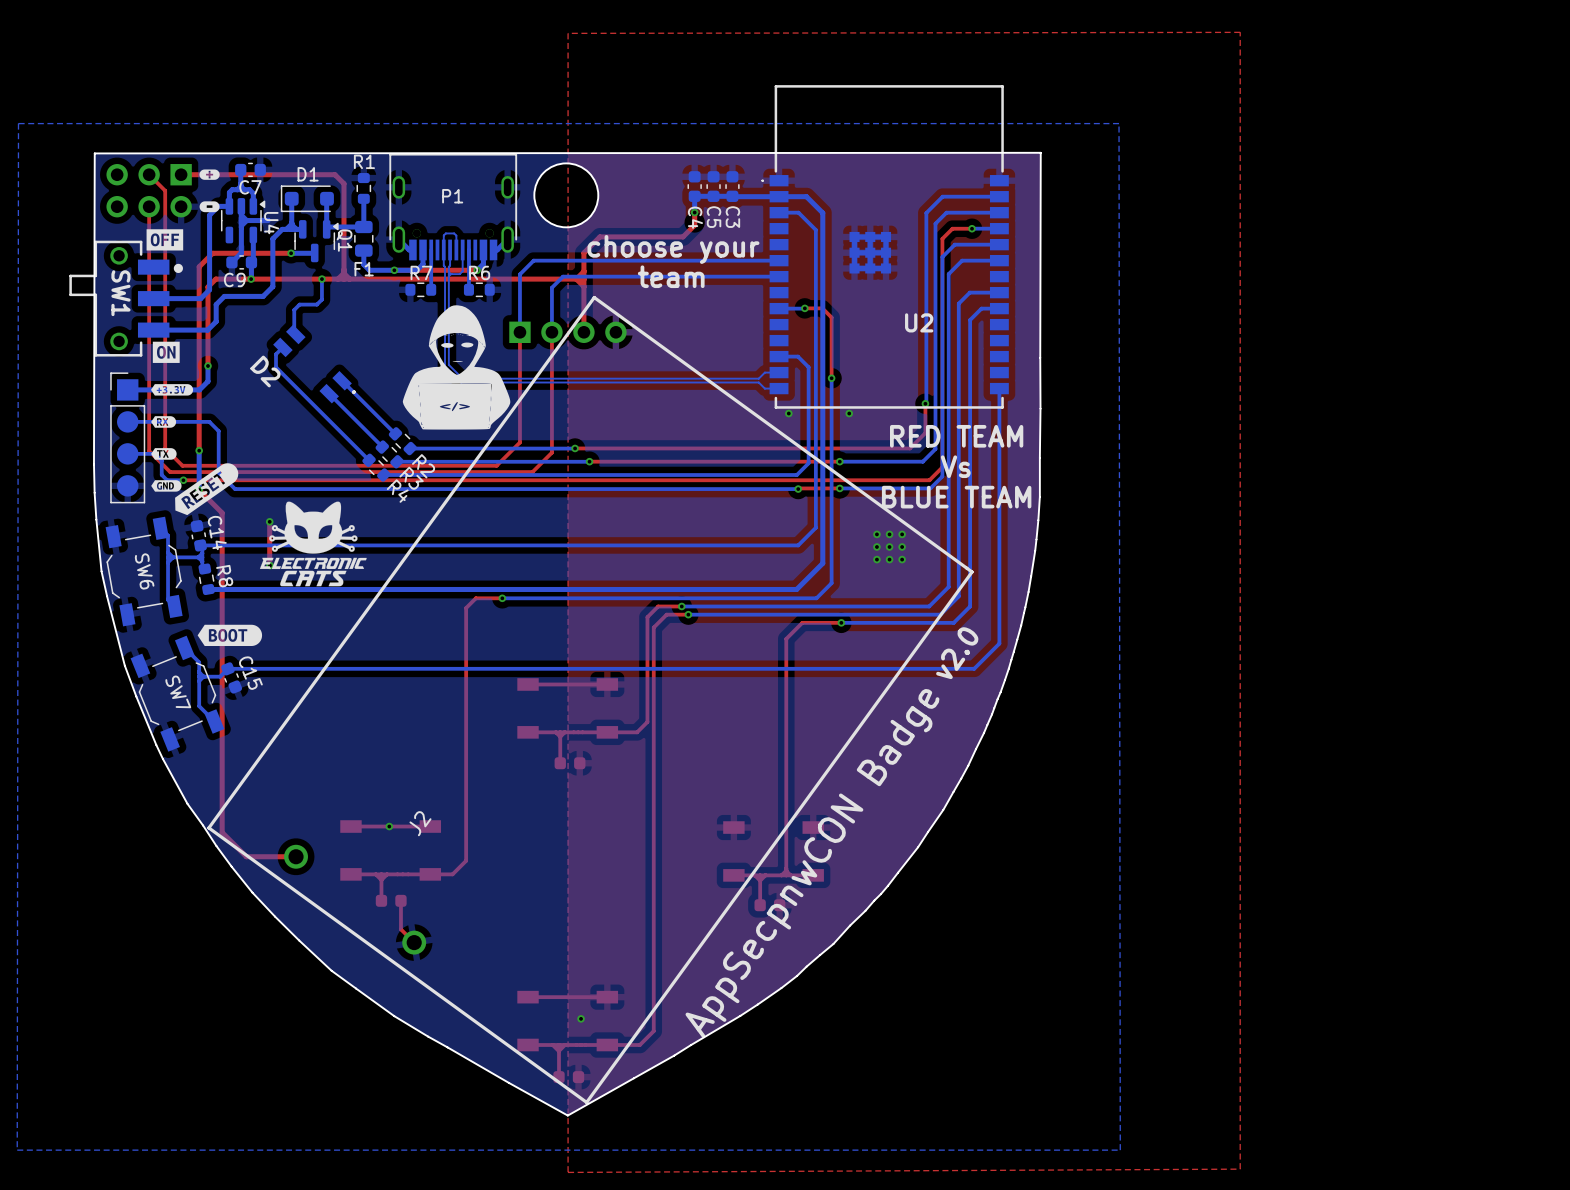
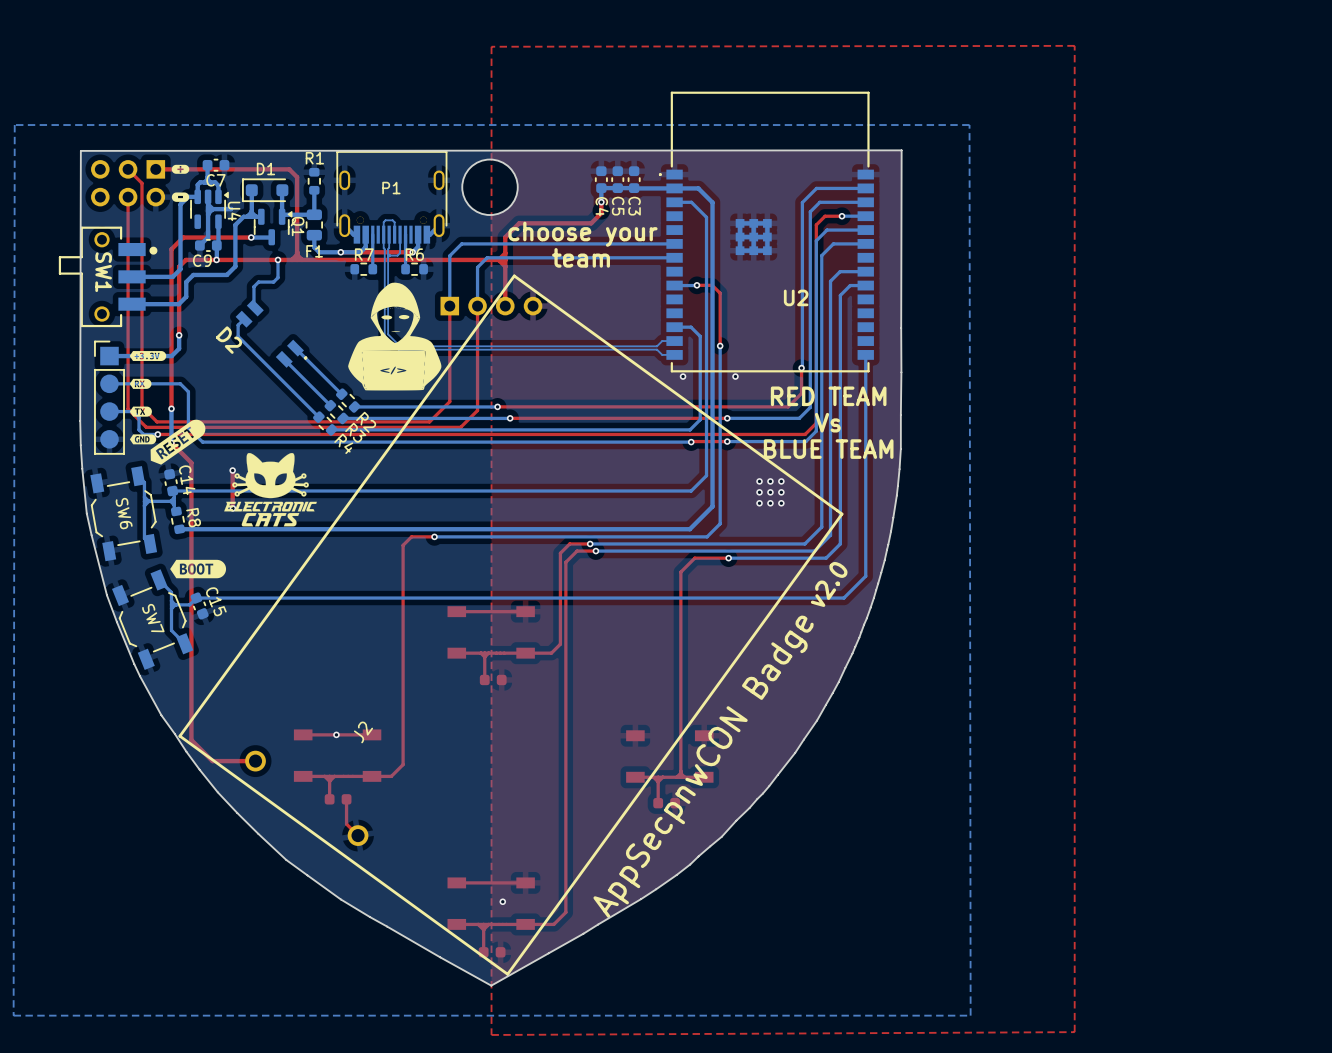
drawing: [146, 229, 184, 251] -> none
drawing: [152, 341, 180, 363] -> none

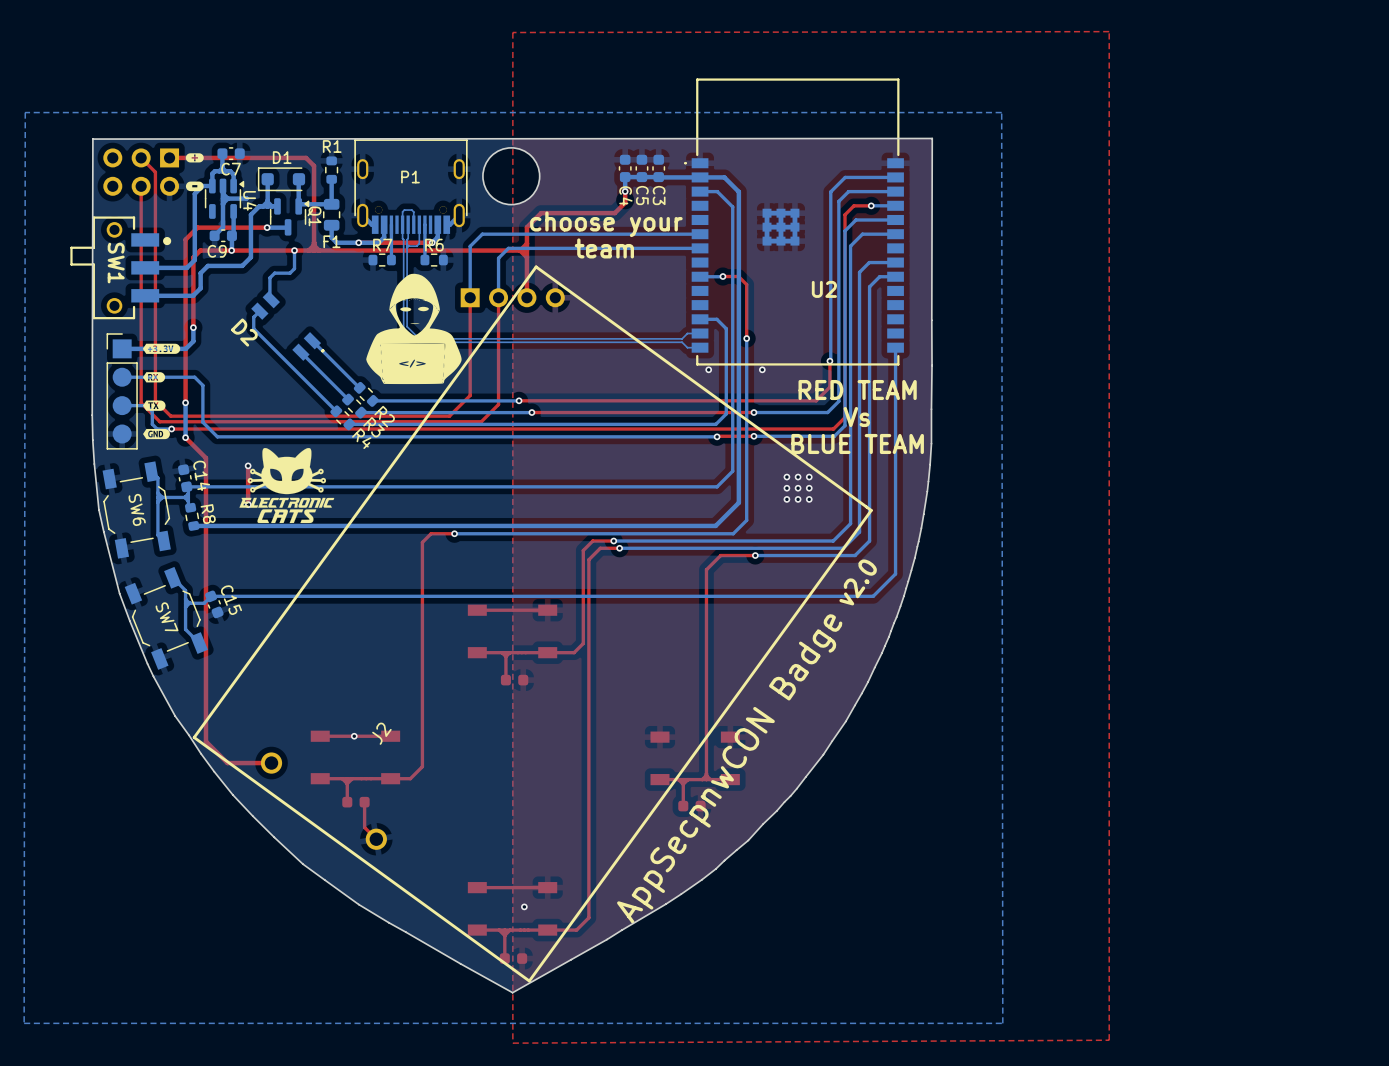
drawing: [150, 419, 206, 465] -> none
drawing: [170, 559, 227, 579] -> none

